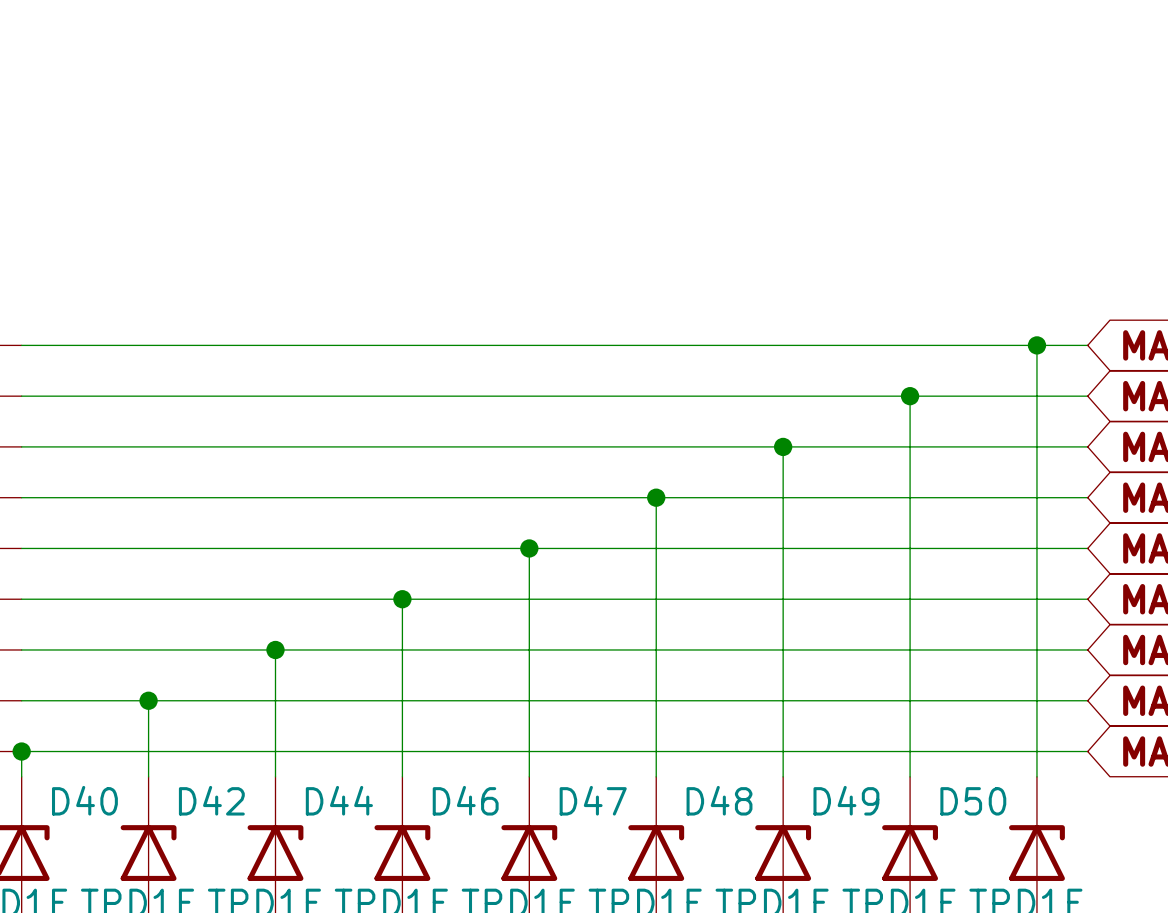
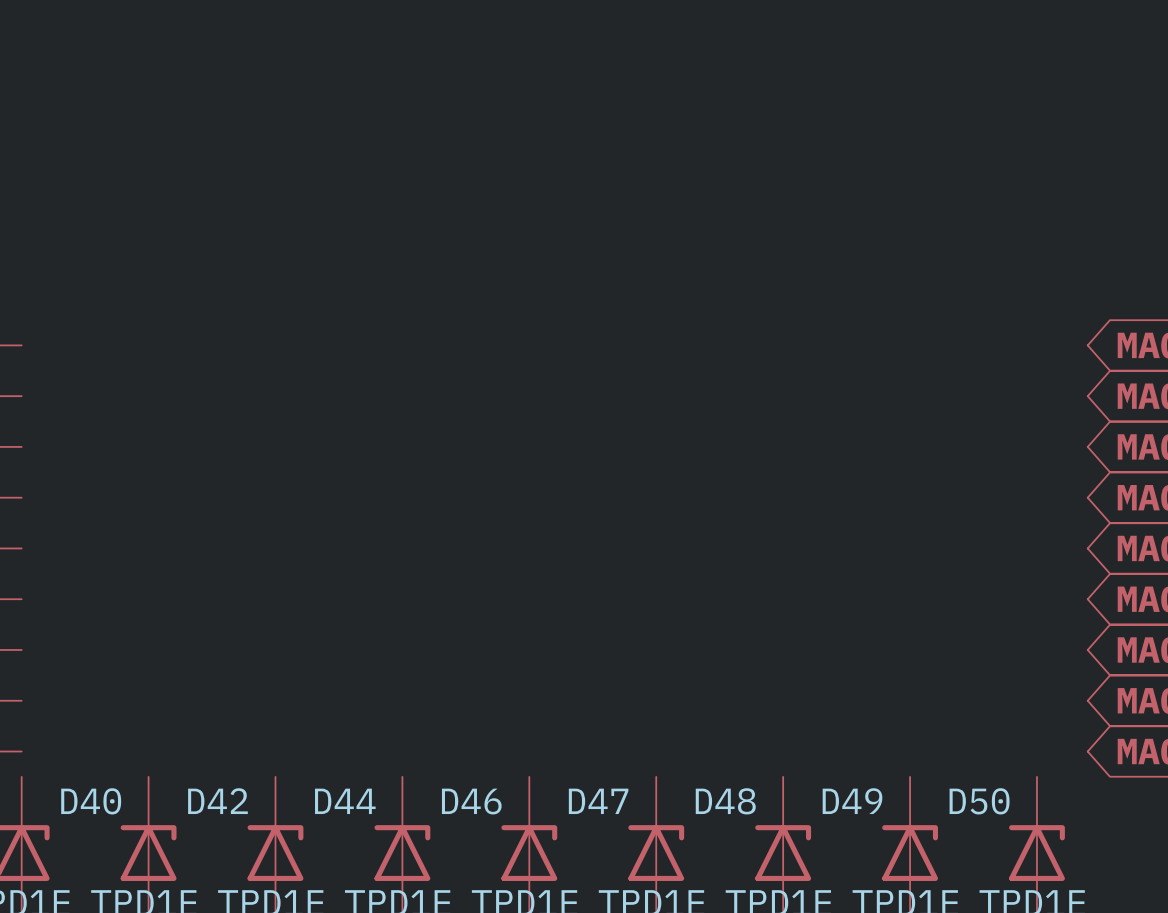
wire: (21, 345) (1087, 345) -> none
wire: (1036, 345) (1036, 776) -> none
junction: (1036, 345) -> none
wire: (21, 396) (1087, 396) -> none
wire: (910, 396) (910, 776) -> none
junction: (910, 396) -> none
wire: (21, 446) (1087, 446) -> none
wire: (783, 446) (783, 776) -> none
junction: (783, 446) -> none
wire: (21, 497) (1087, 497) -> none
wire: (656, 497) (656, 776) -> none
junction: (656, 497) -> none
wire: (21, 548) (1087, 548) -> none
wire: (529, 548) (529, 776) -> none
junction: (529, 548) -> none
wire: (21, 599) (1087, 599) -> none
wire: (402, 599) (402, 776) -> none
junction: (402, 599) -> none
wire: (21, 649) (1087, 649) -> none
wire: (275, 649) (275, 776) -> none
junction: (275, 649) -> none
wire: (21, 700) (1087, 700) -> none
wire: (148, 700) (148, 776) -> none
junction: (148, 700) -> none
junction: (21, 751) -> none
wire: (1087, 751) (21, 751) (21, 776) -> none

